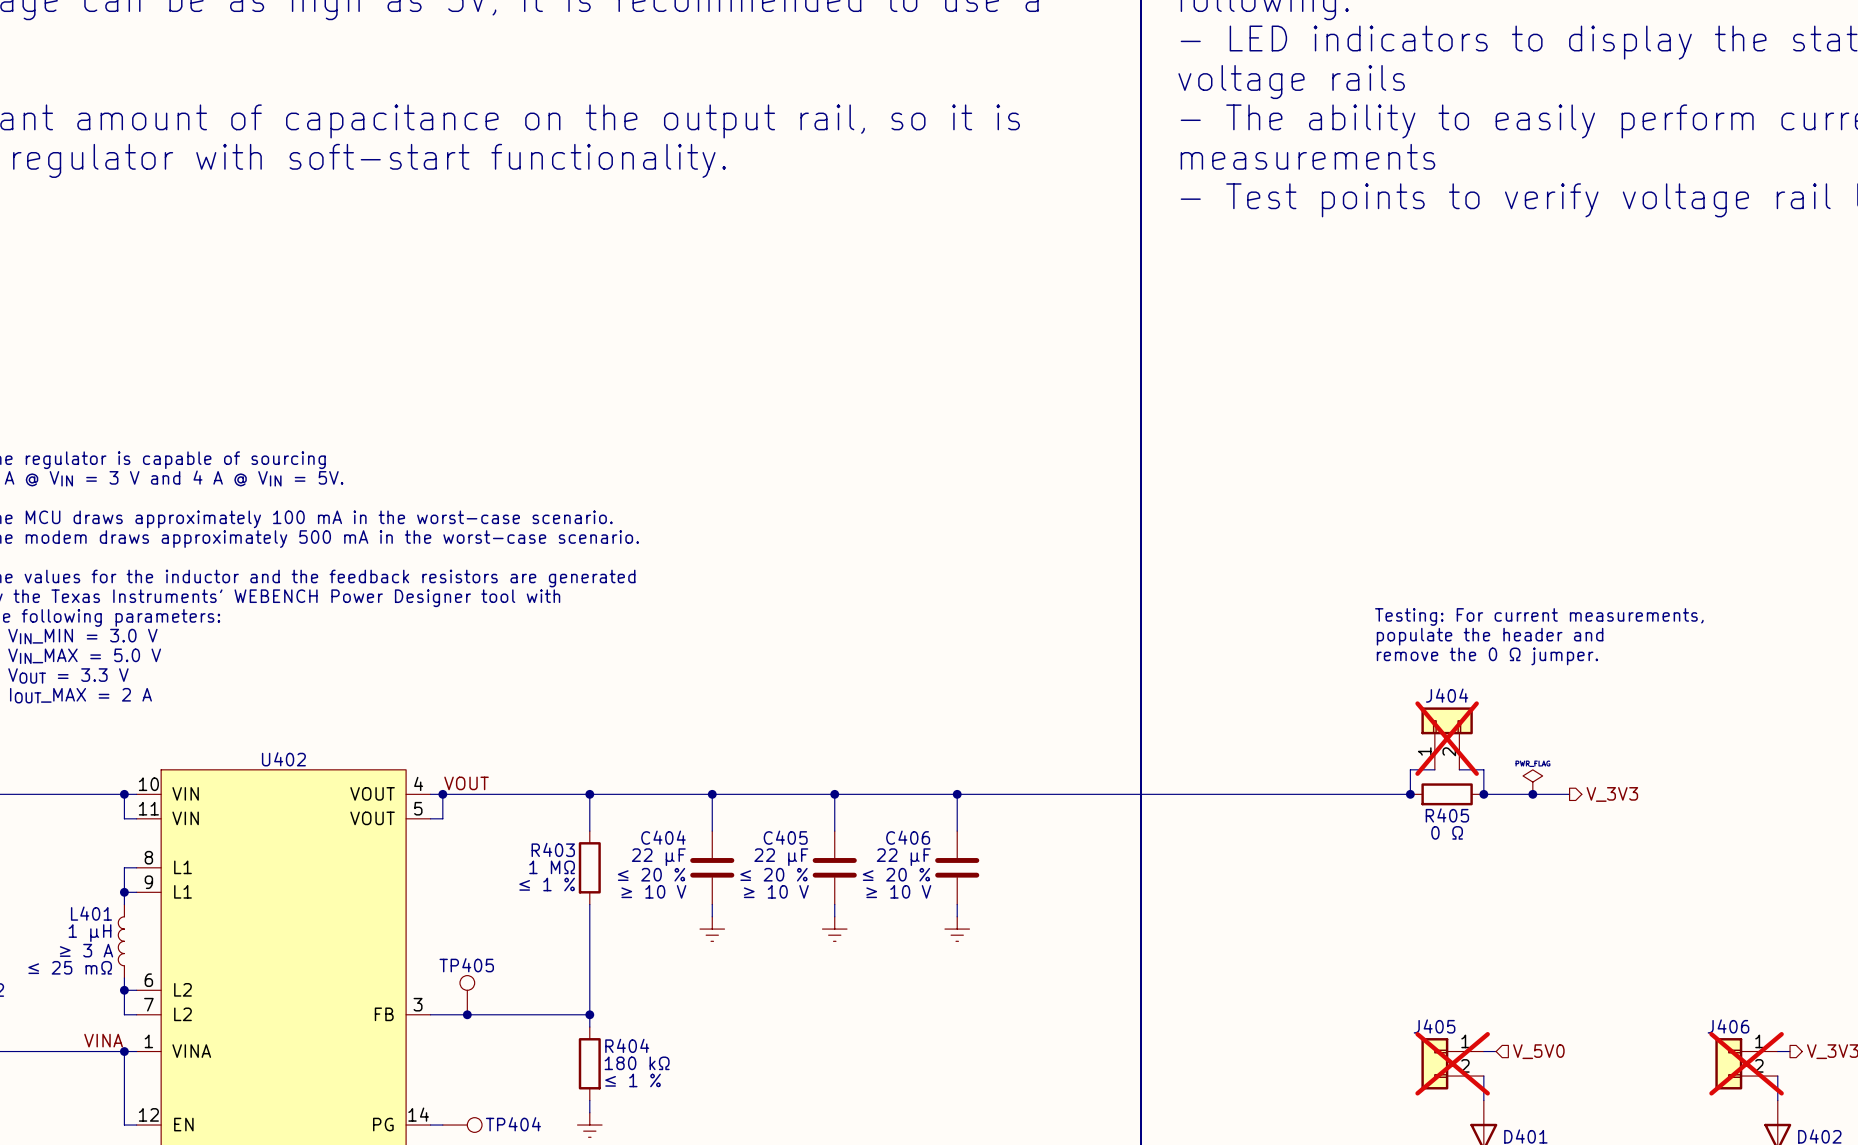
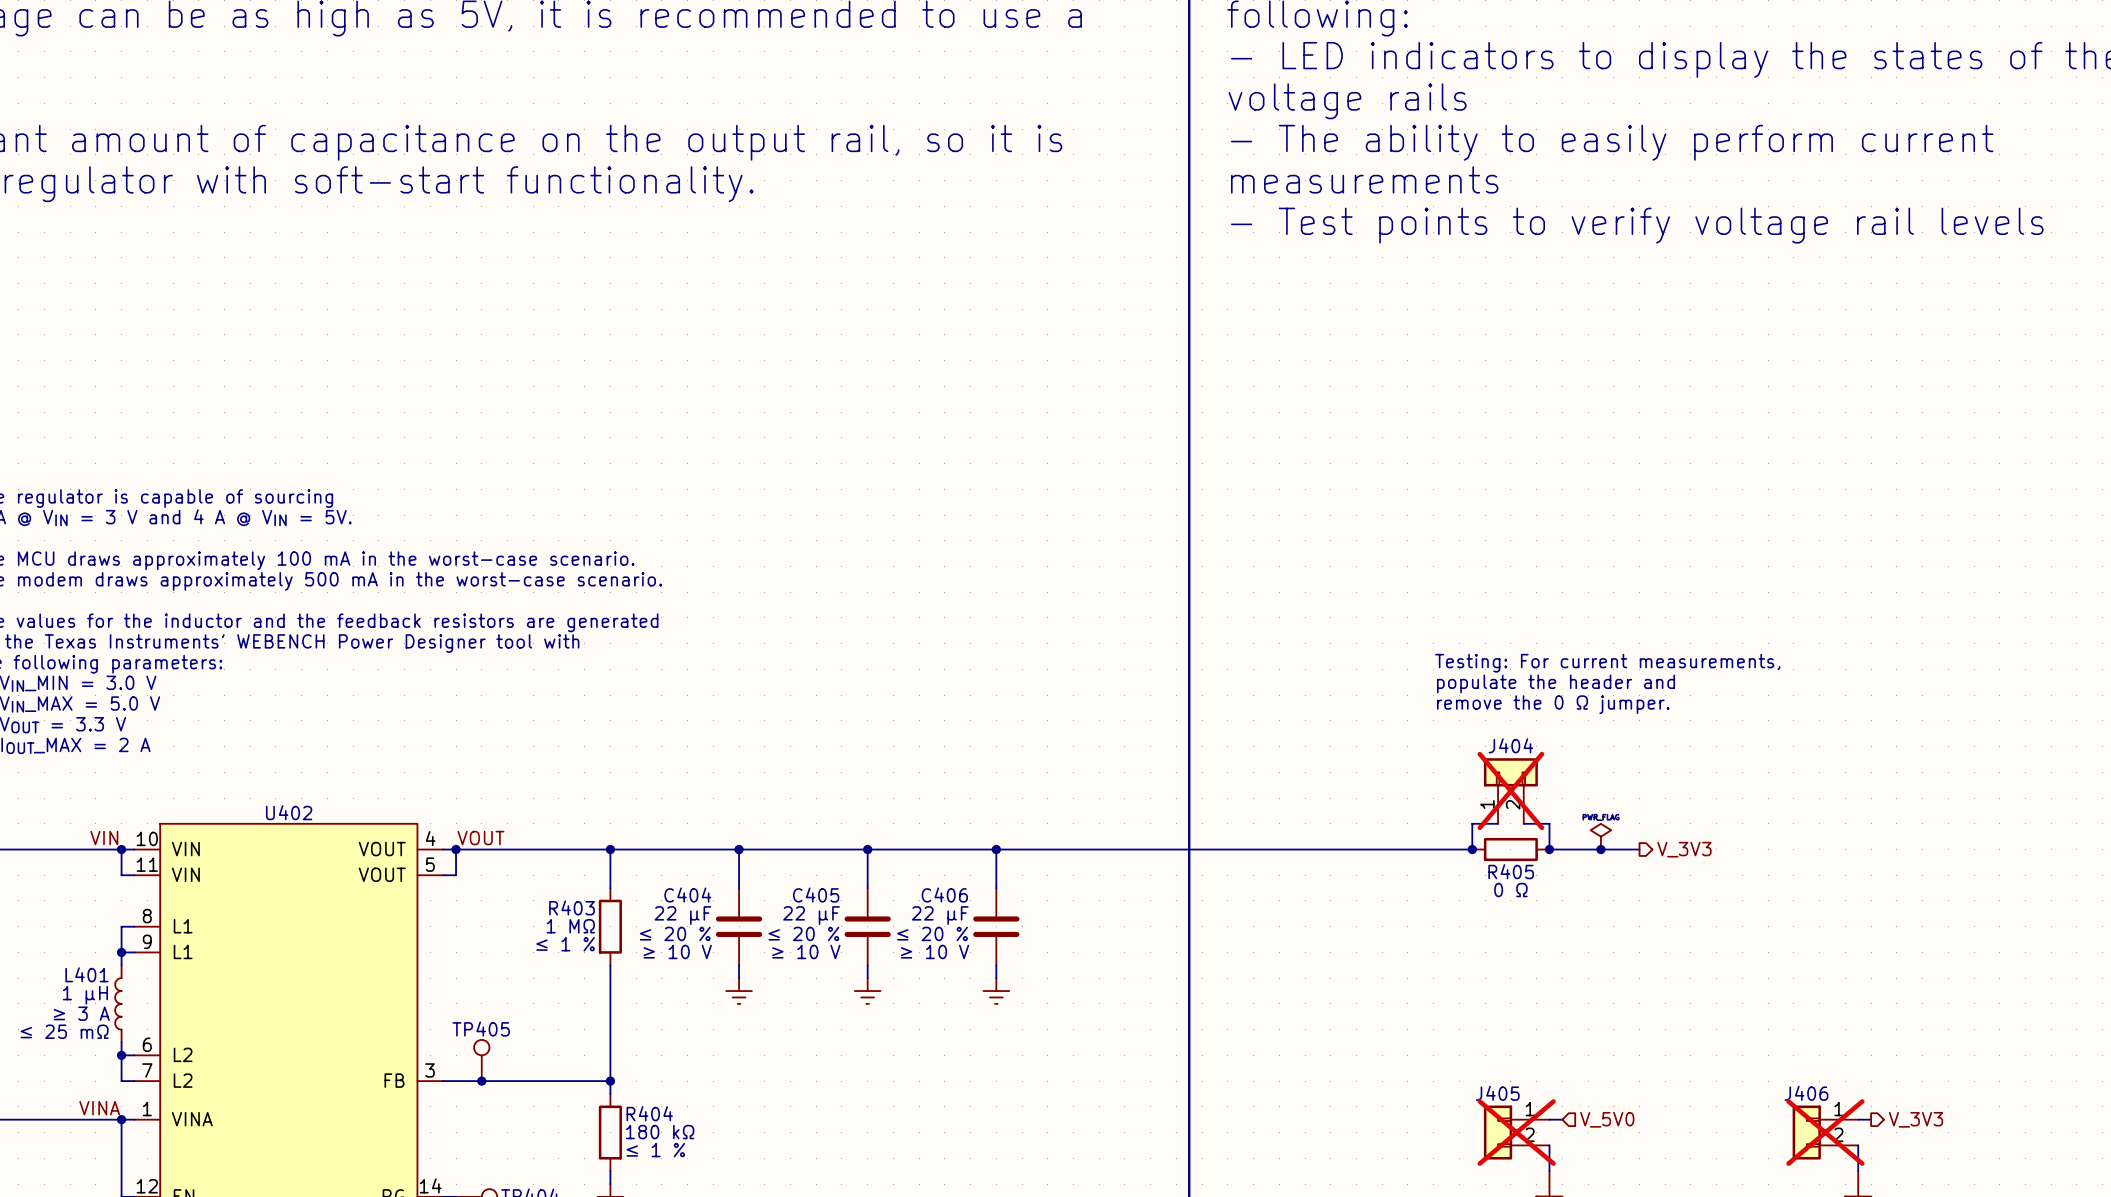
label: none -> VIN (104, 838)

